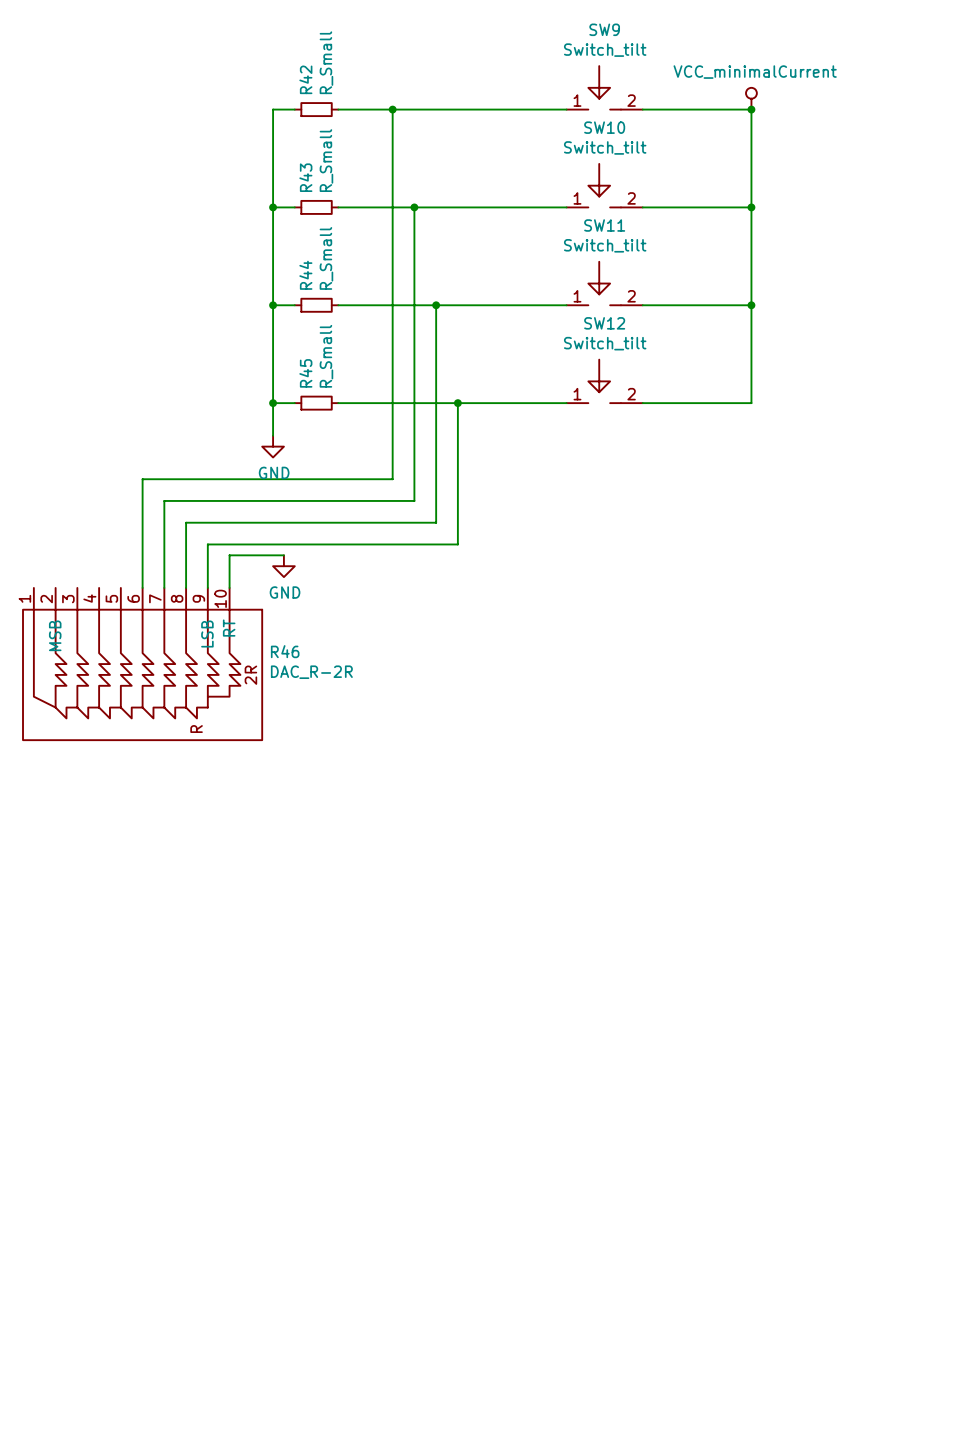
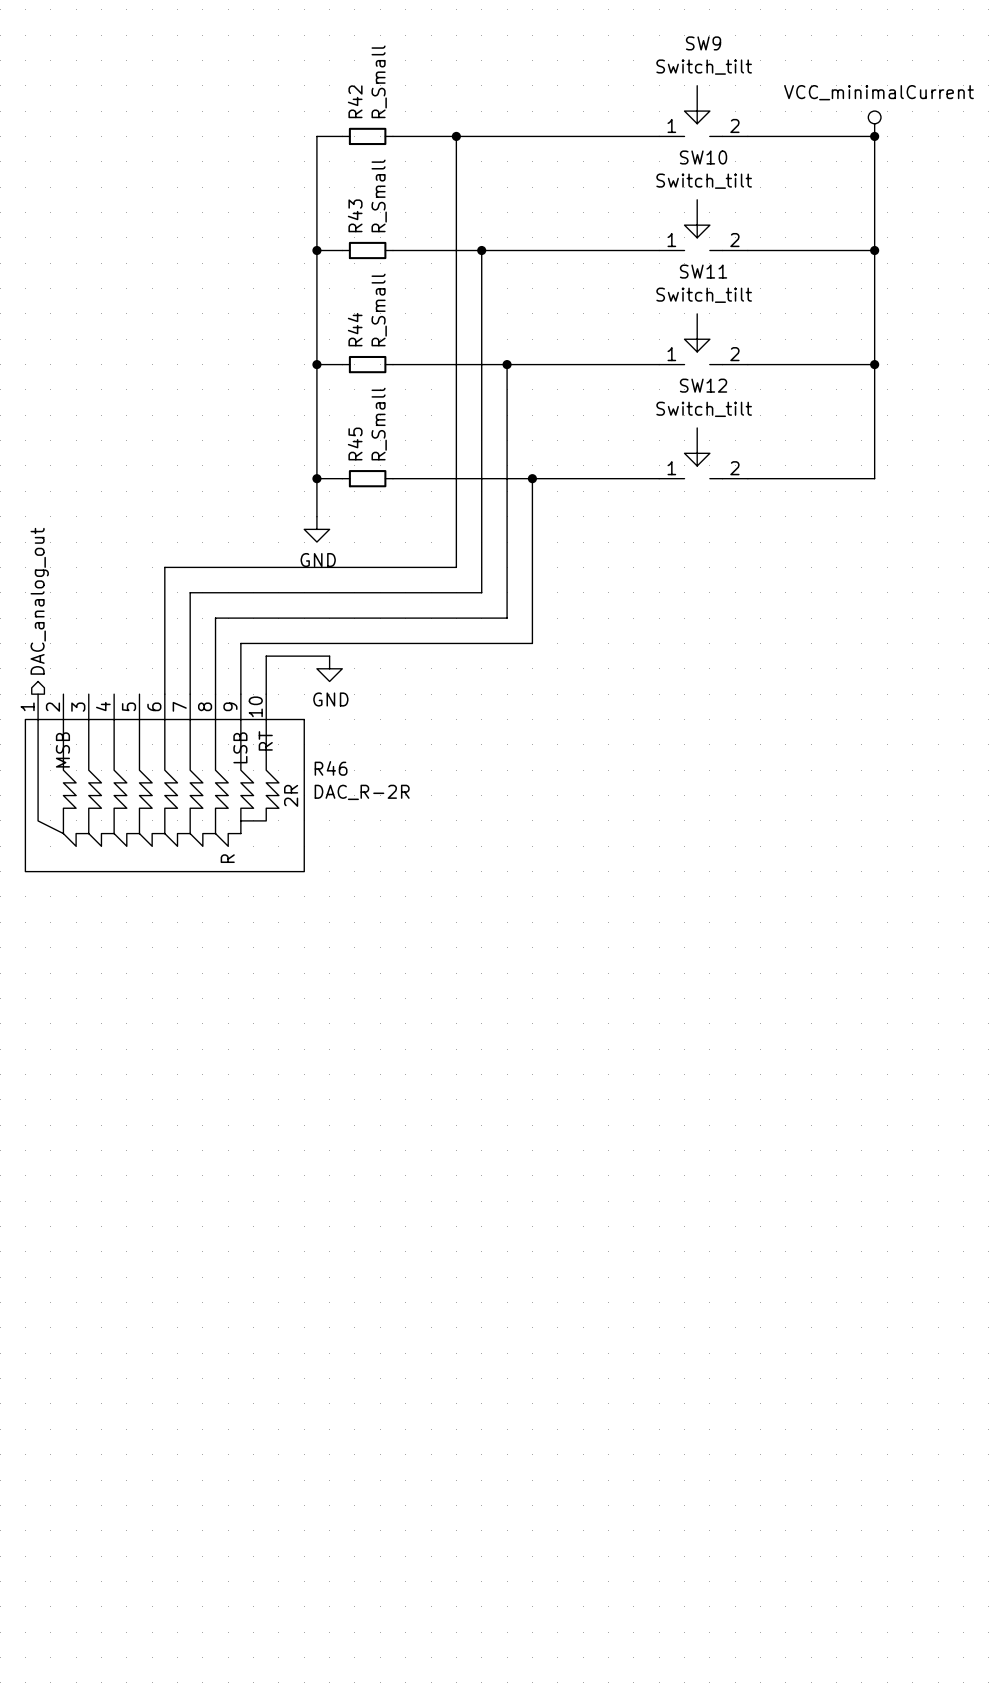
hierarchical label: none -> DAC_analog_out (39, 601)

